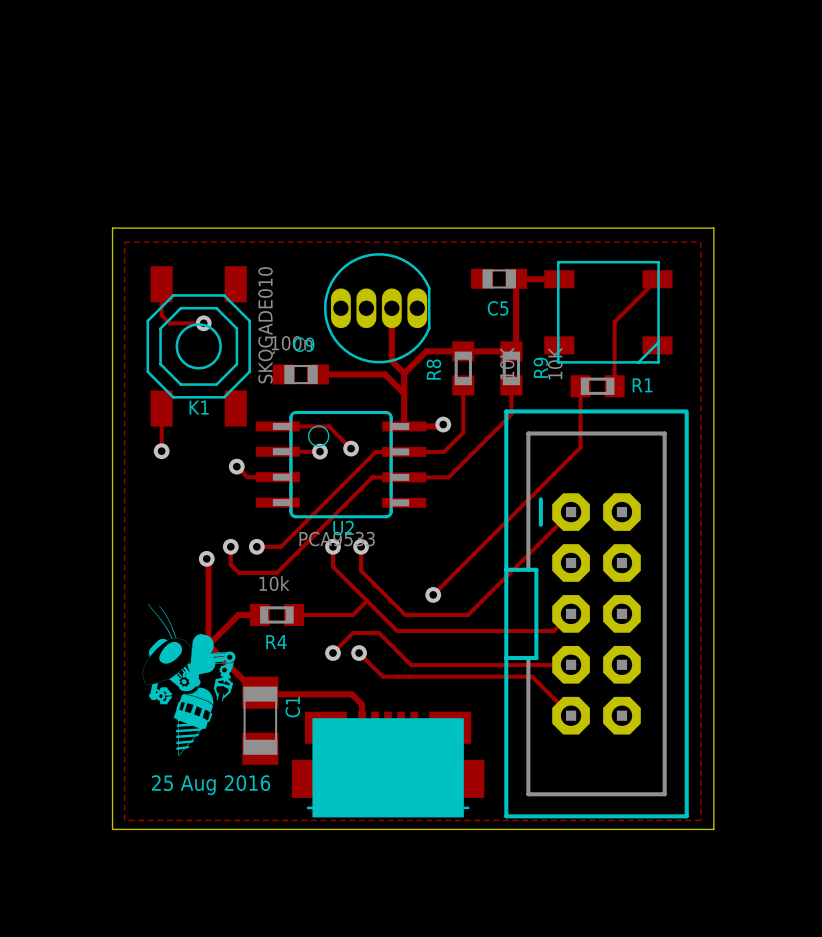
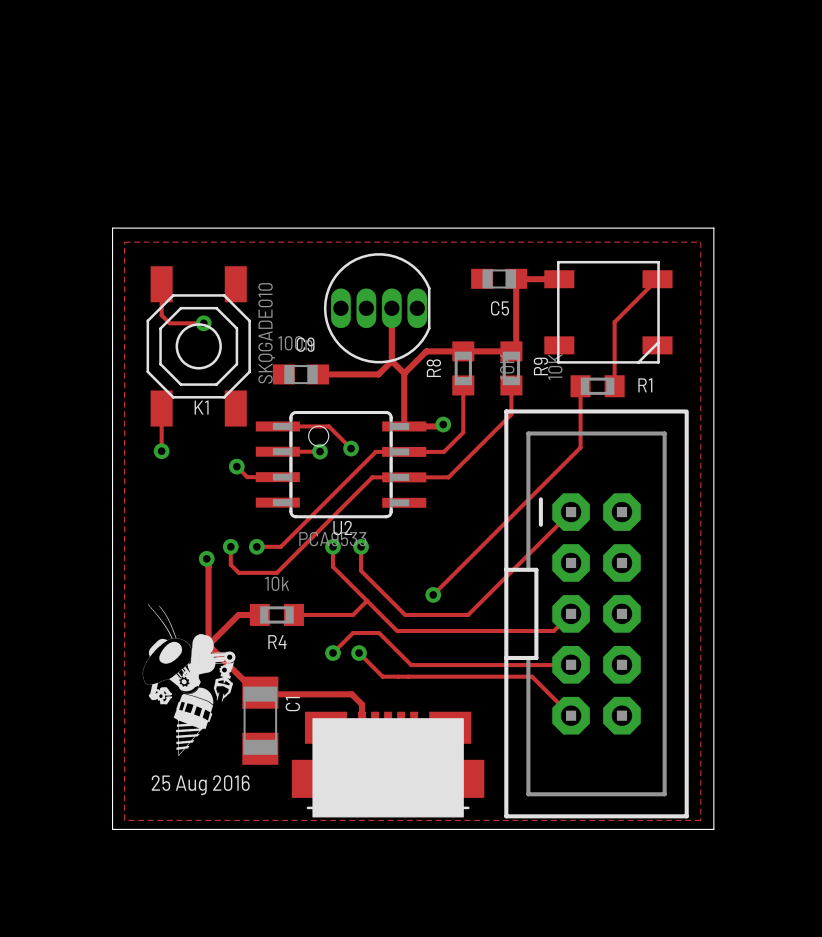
track: (378, 374) (385, 374) (404, 393) -> (378, 374) (391, 361)

